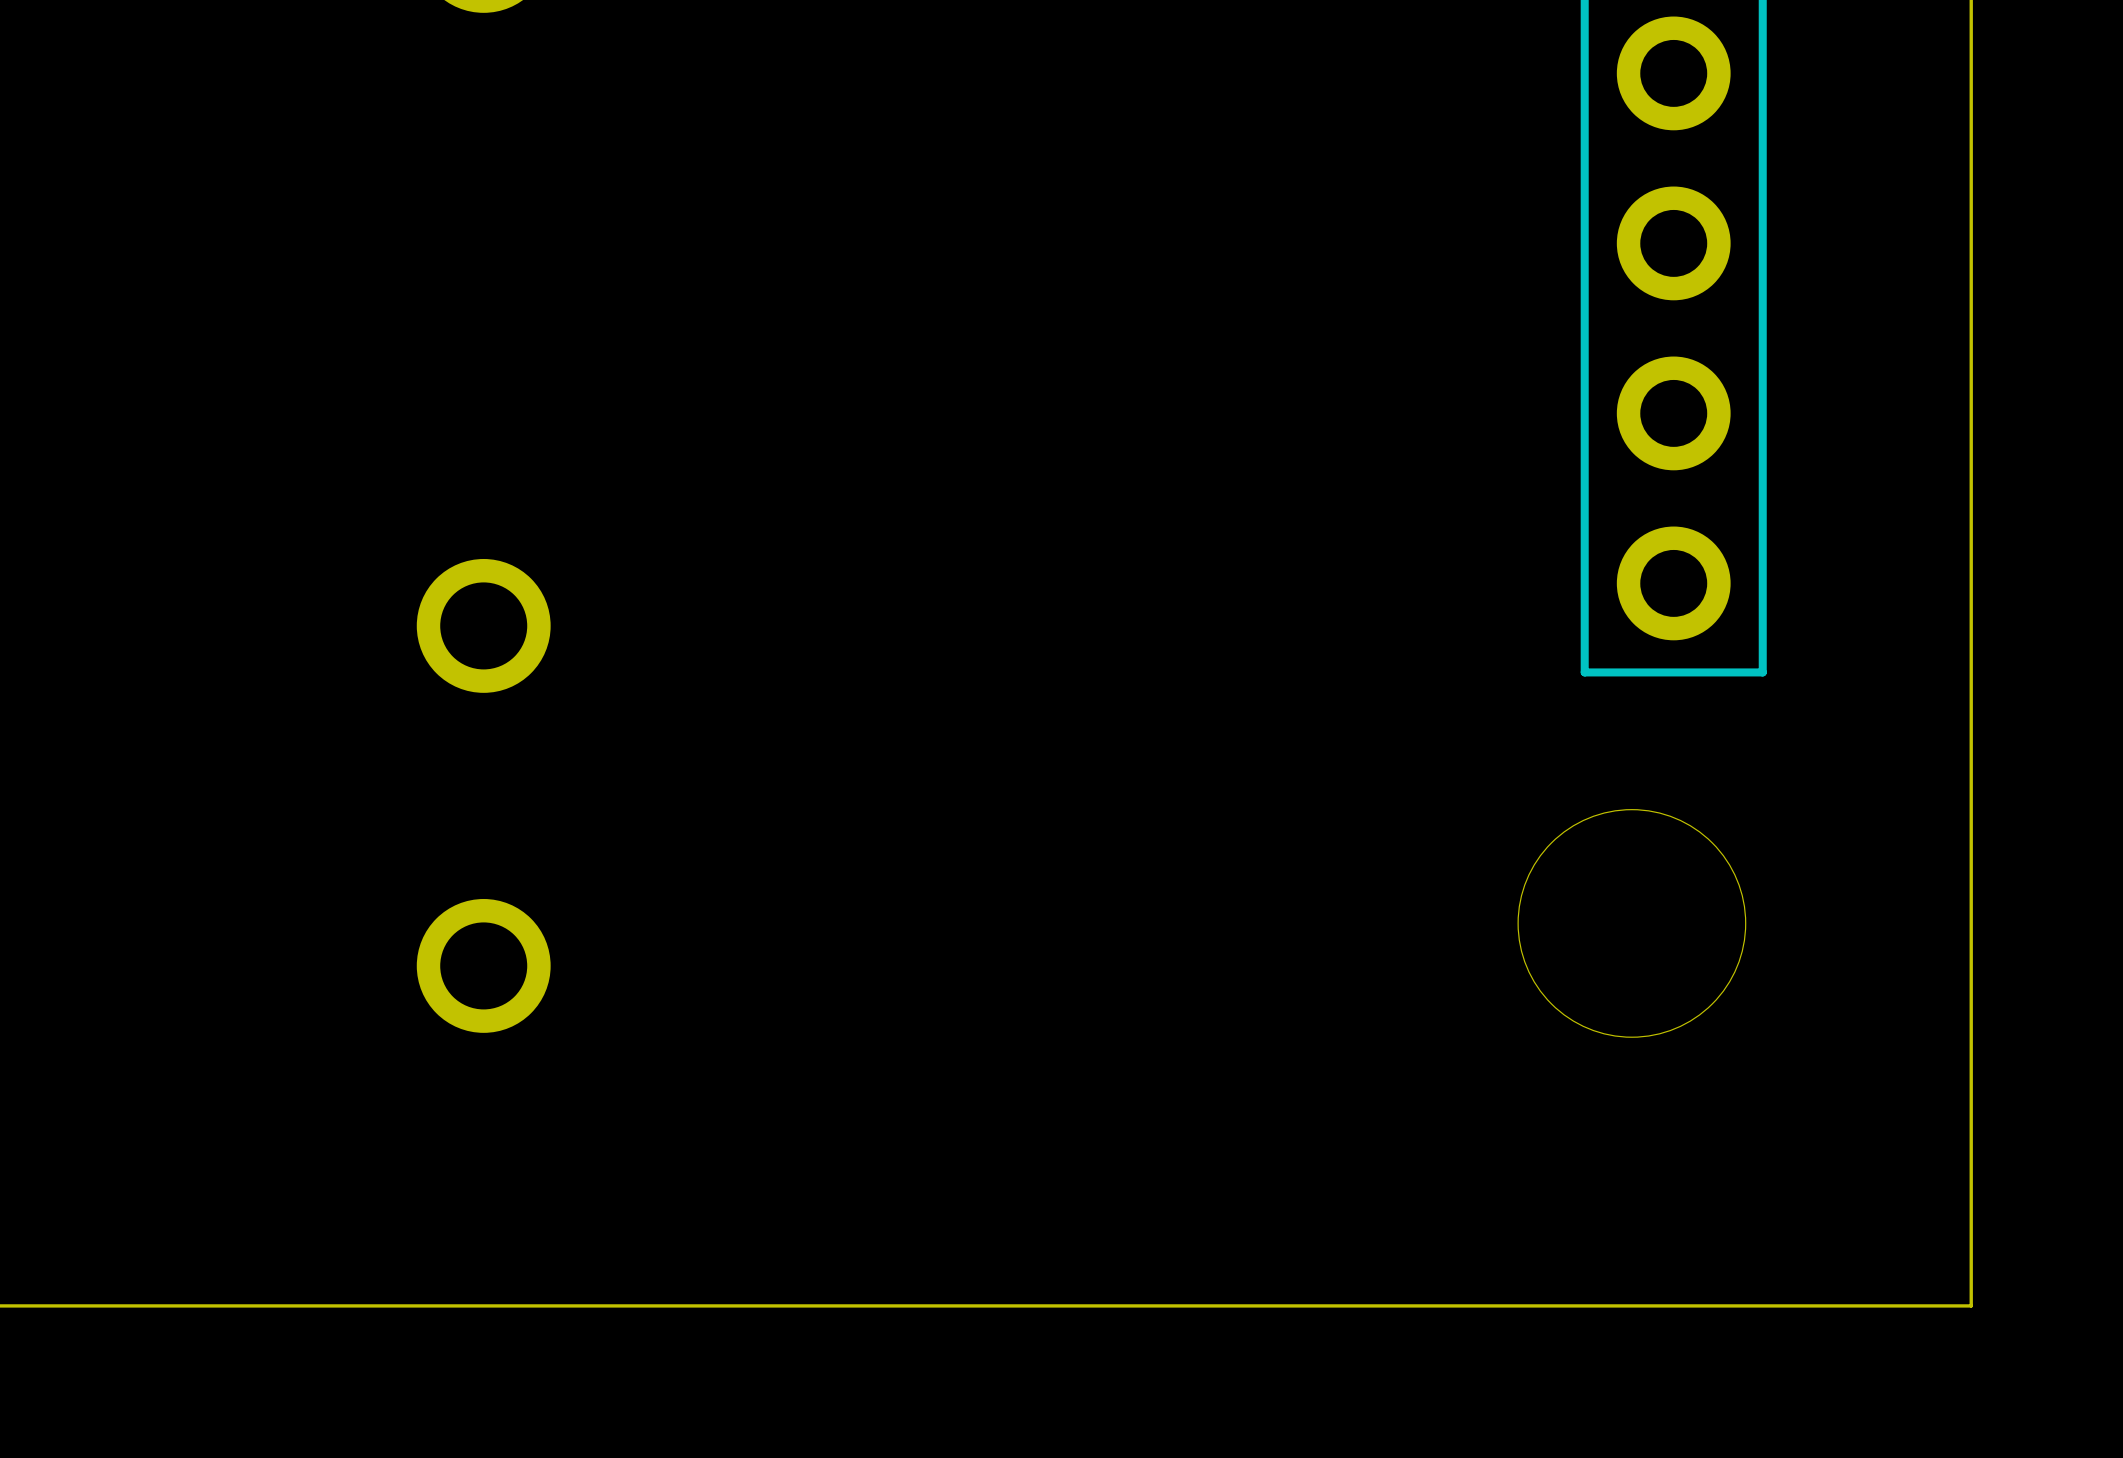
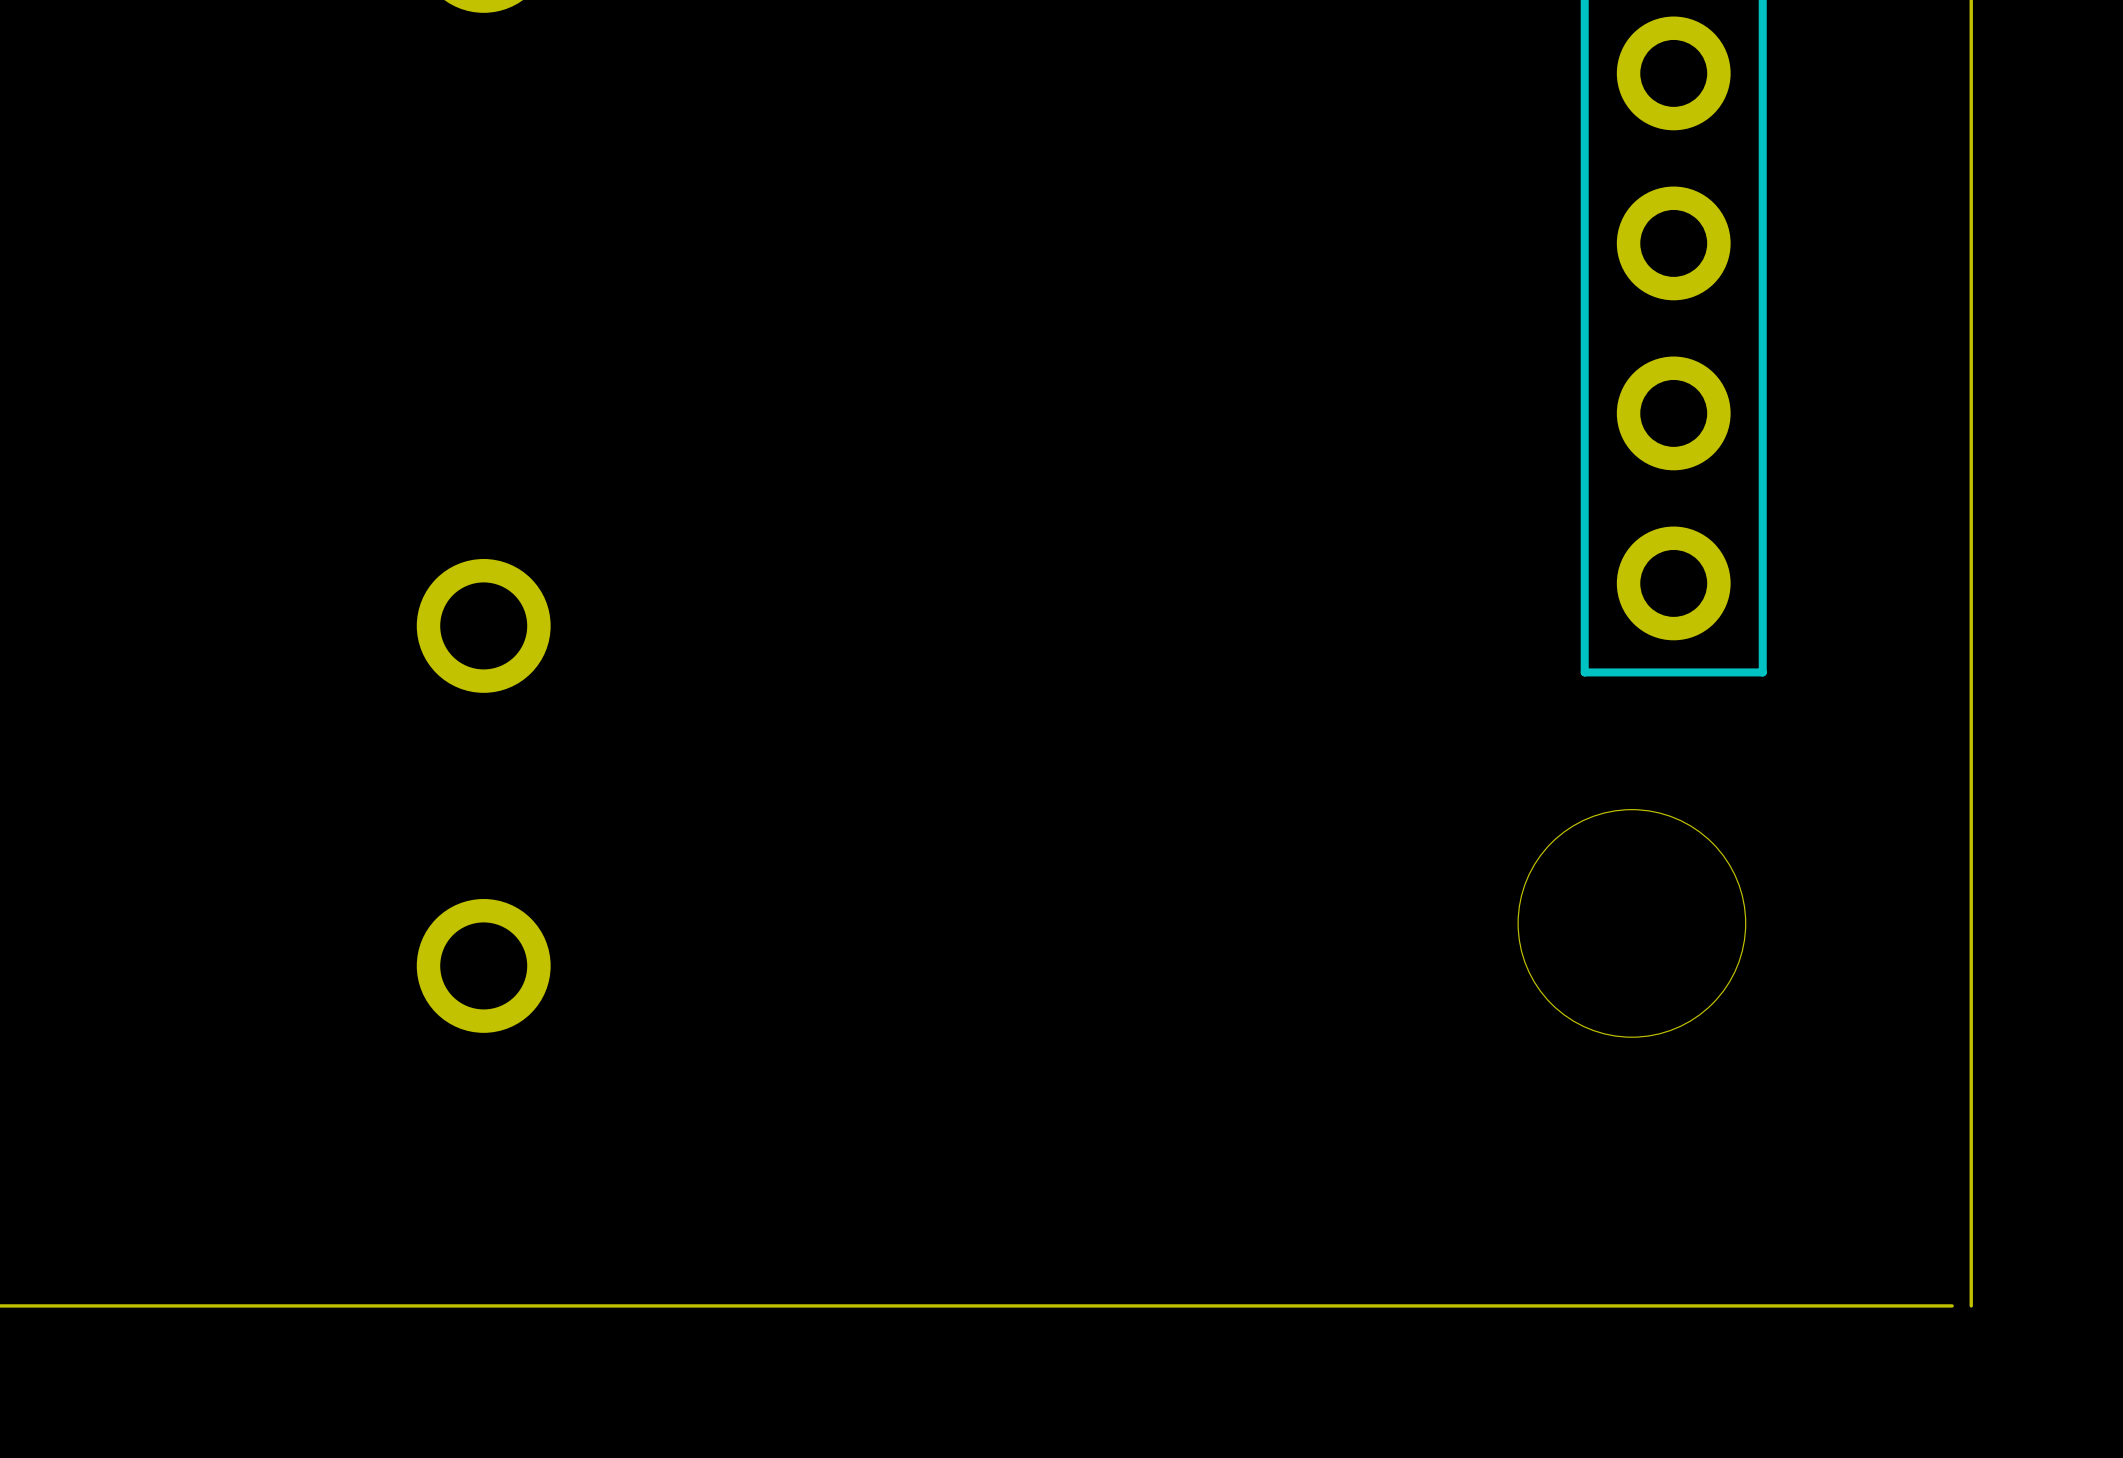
board edge: (1971, 1305) (1952, 1305) -> none

